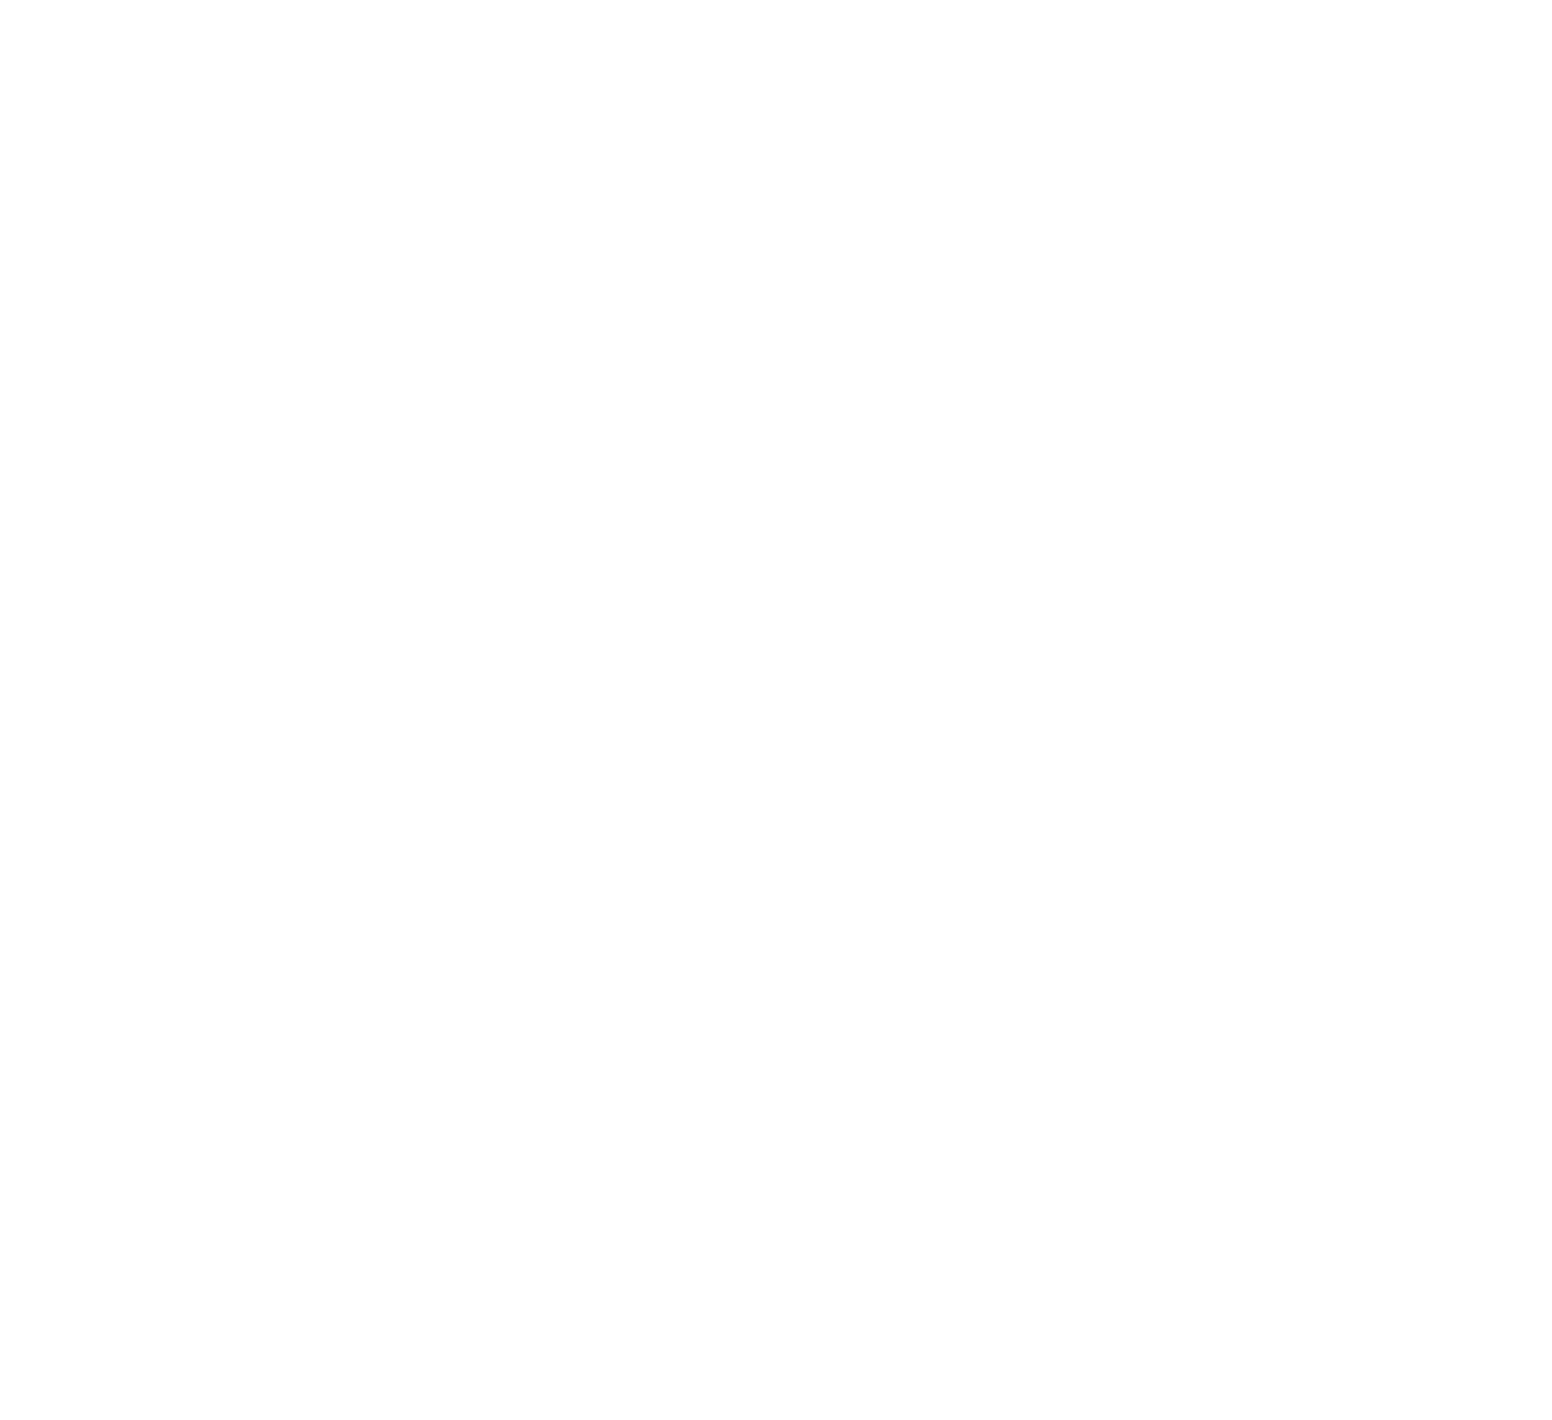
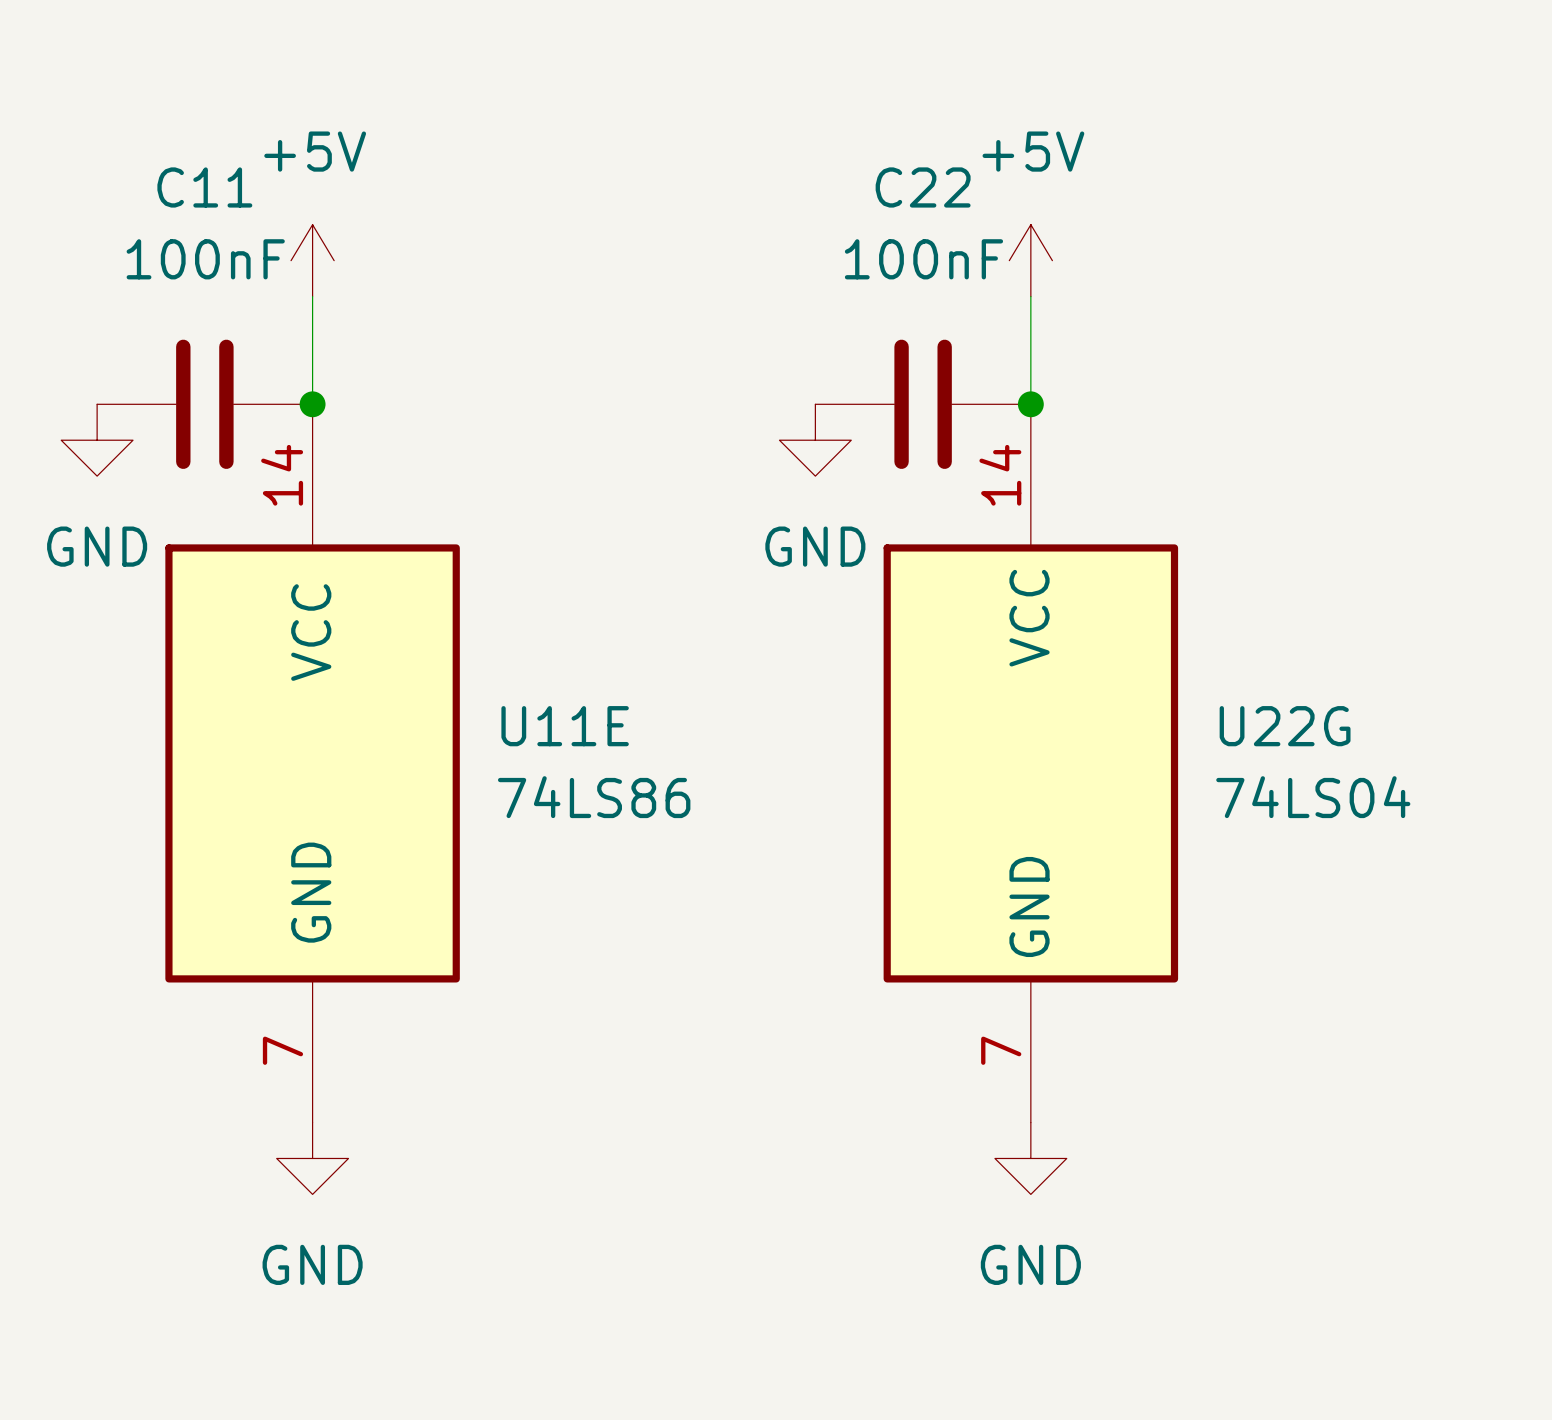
power symbol: none -> +5V (312, 260)
power symbol: none -> +5V (1030, 260)
wire: none -> (312, 296) (312, 404)
wire: none -> (1030, 296) (1030, 404)
C11: none -> 100nF (204, 404)
junction: none -> (312, 404)
C22: none -> 100nF (923, 404)
junction: none -> (1030, 404)
power symbol: none -> GND (97, 440)
power symbol: none -> GND (815, 440)
U11E: none -> 74LS86 (312, 763)
U22G: none -> 74LS04 (1030, 763)
power symbol: none -> GND (312, 1158)
power symbol: none -> GND (1030, 1158)

